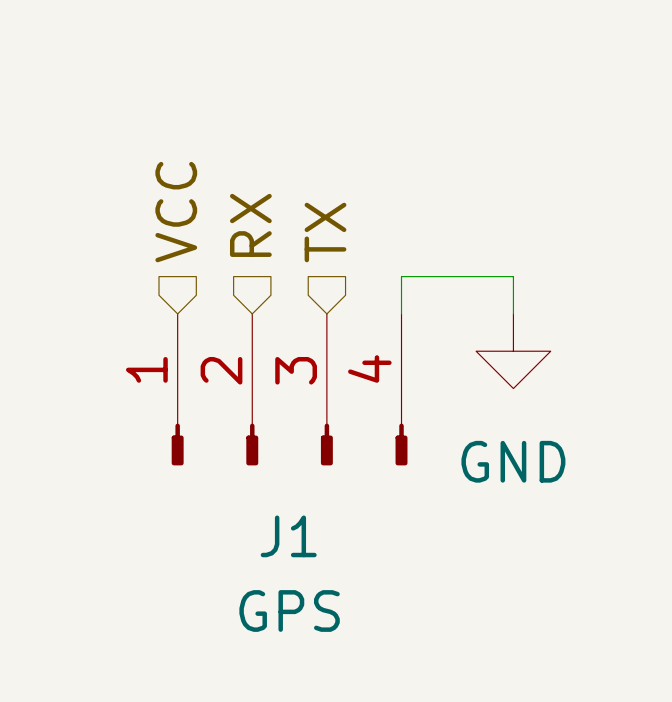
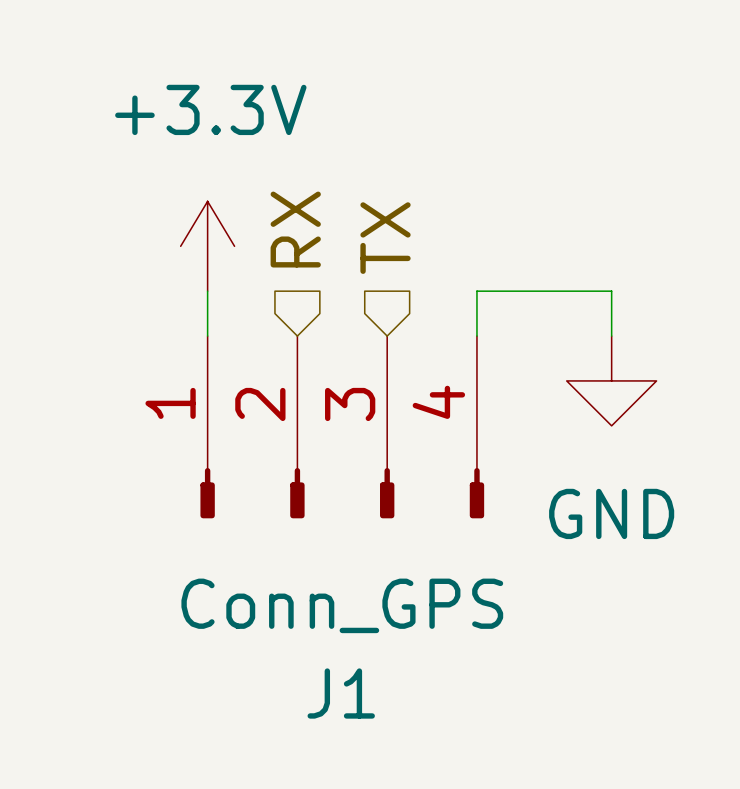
hierarchical label: VCC (176, 212) -> none
power symbol: none -> +3.3V (207, 246)
wire: none -> (207, 291) (207, 336)
J1 name position: J1 (288, 536) -> J1 (341, 693)
J1 value: GPS (289, 610) -> Conn_GPS (342, 605)

